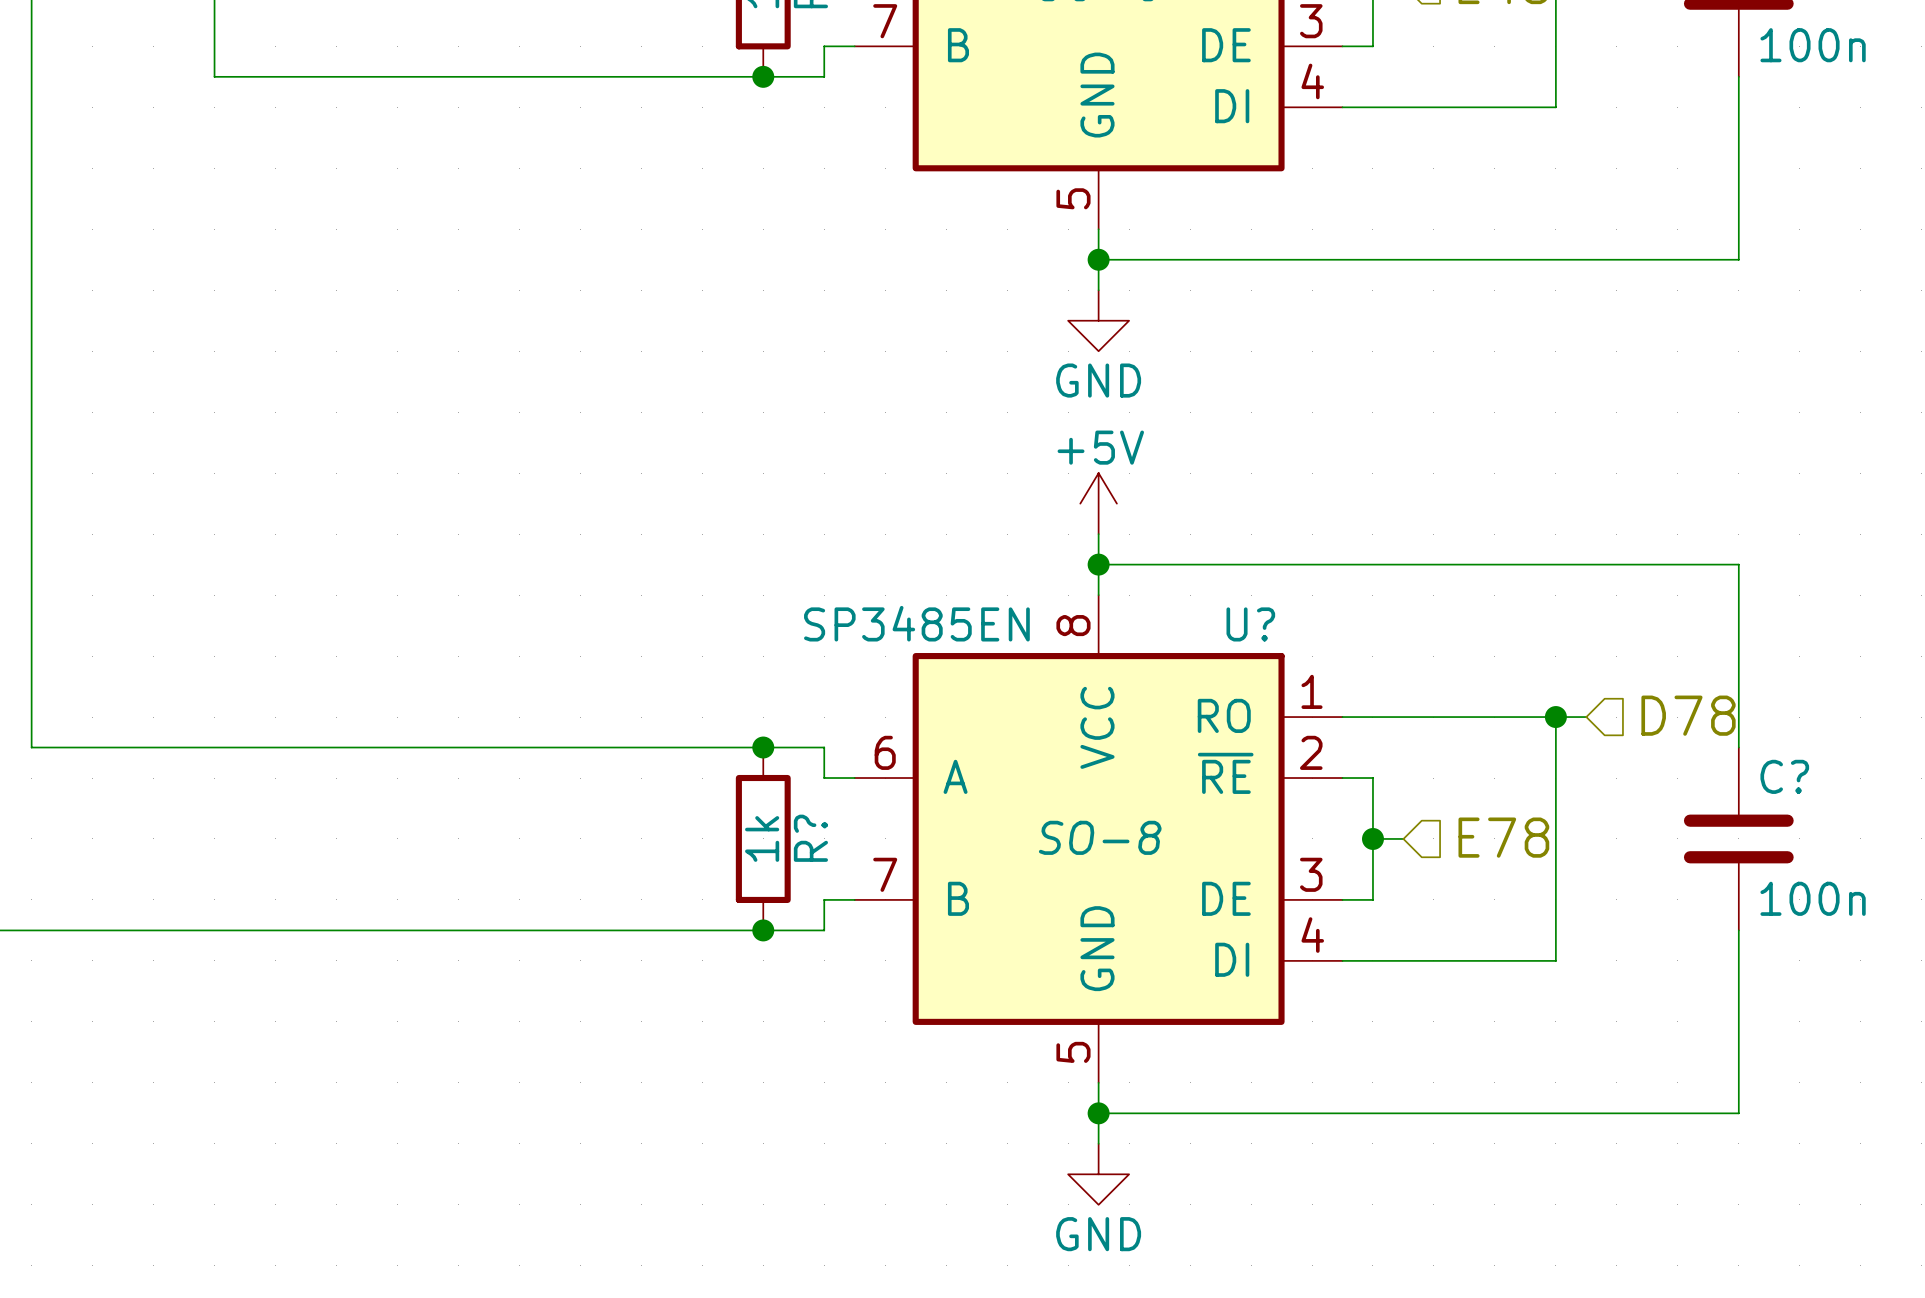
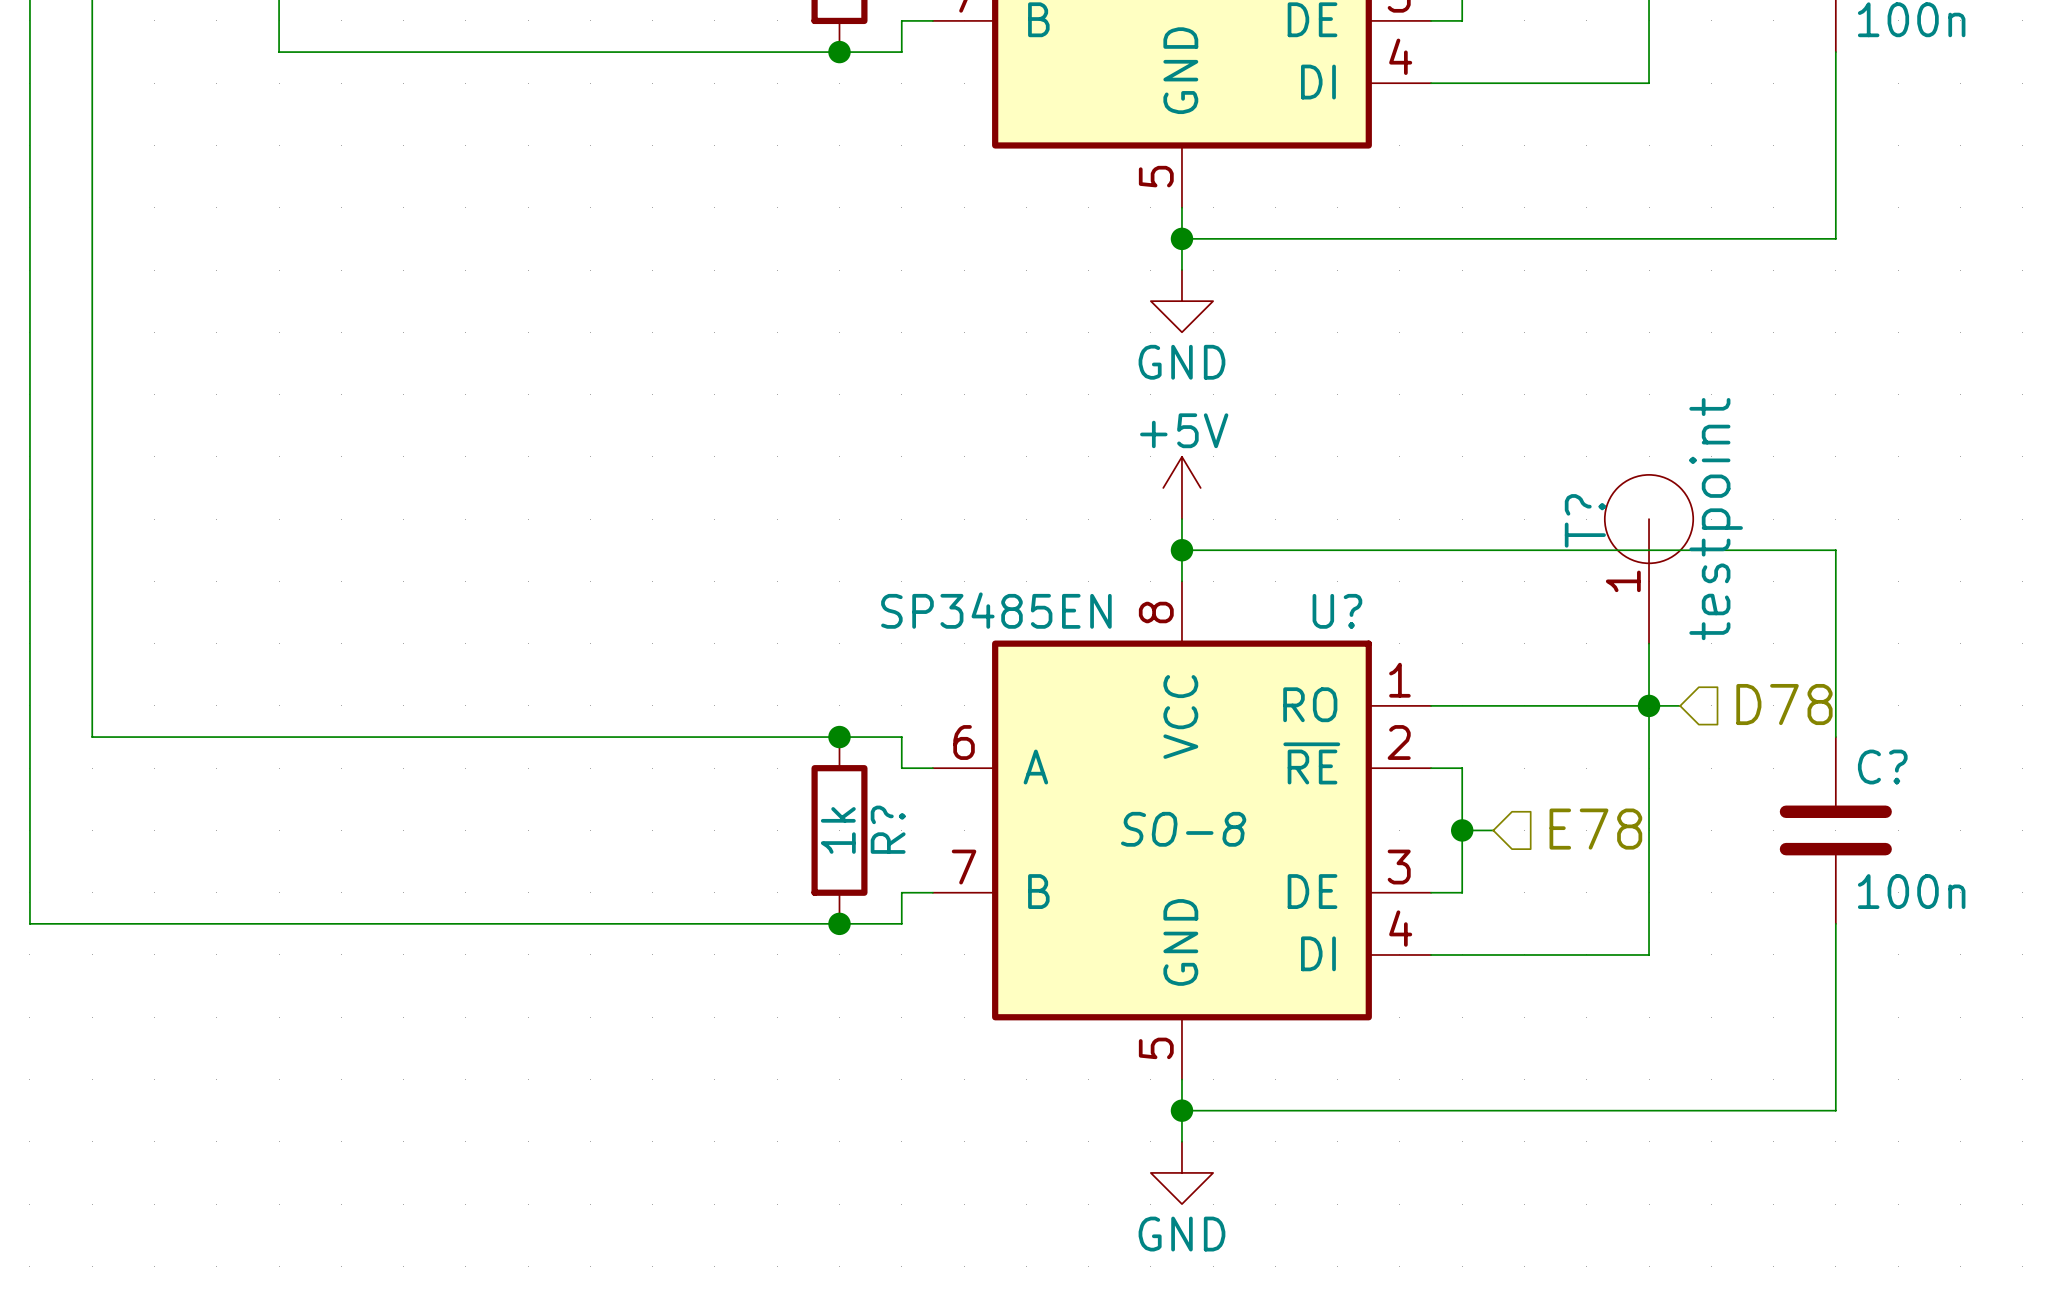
T?: none -> testpoint (1649, 559)
wire: none -> (1649, 643) (1649, 705)

